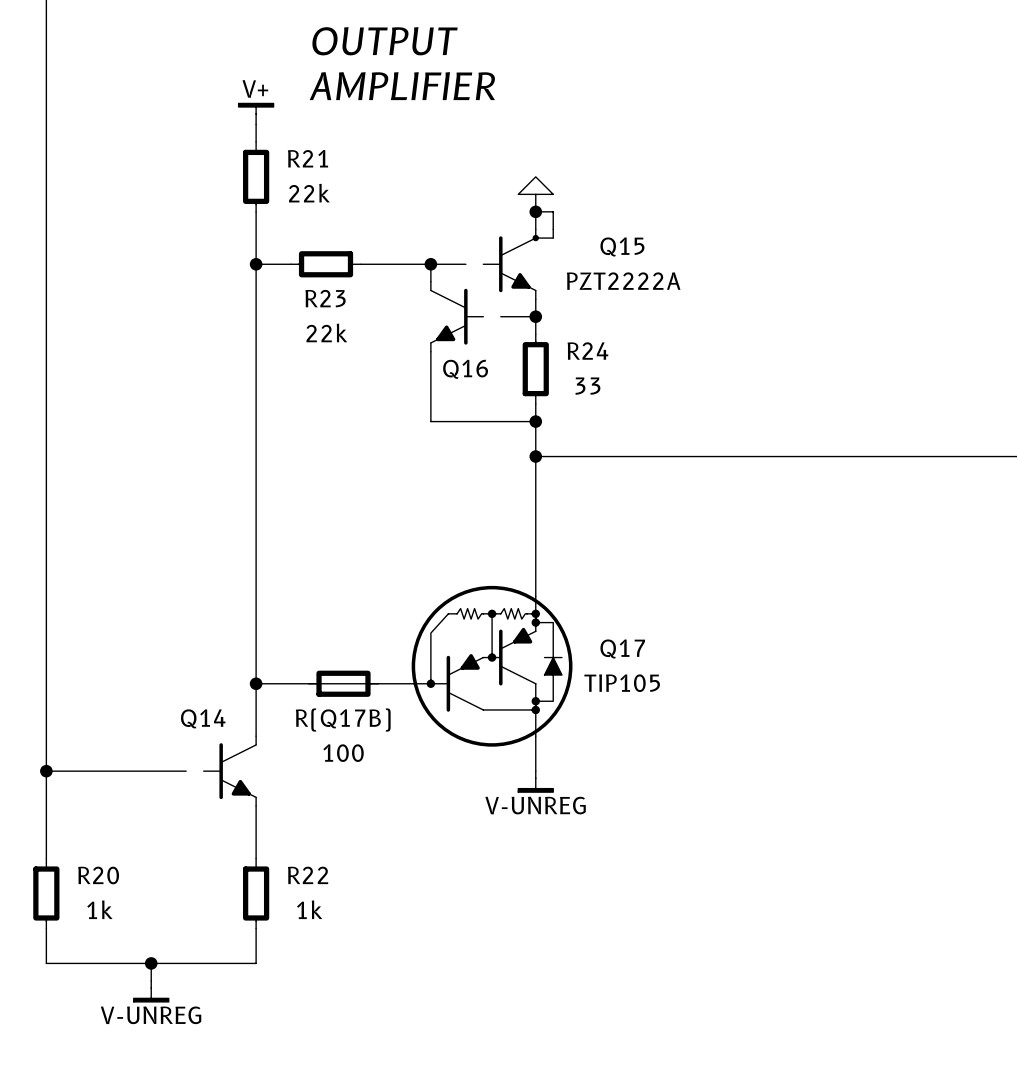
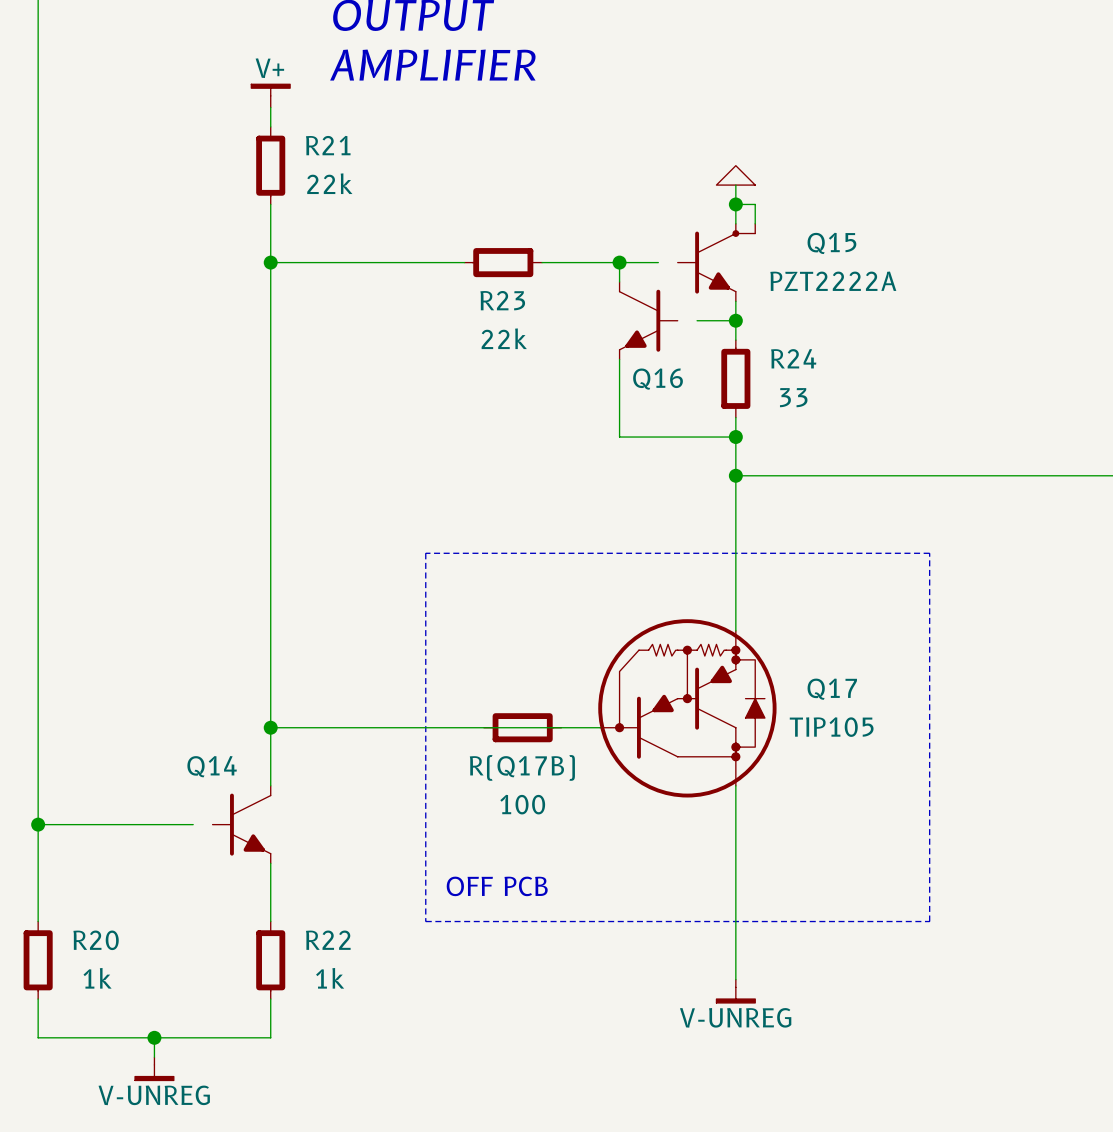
power symbol position: (535, 185) -> (735, 175)
wire: (535, 194) (535, 229) -> (735, 185) (735, 223)
wire: (535, 211) (553, 211) (553, 229) -> (735, 204) (755, 204) (755, 223)
junction: (535, 211) -> none
junction: none -> (735, 204)
wire: none -> (309, 262) (387, 262)
R23 position: (326, 264) -> (503, 262)
junction: (430, 264) -> none
wire: (465, 264) (430, 264) (430, 281) -> none
wire: none -> (542, 262) (658, 262)
Q15 position: (518, 264) -> (716, 262)
wire: none -> (619, 262) (619, 281)
junction: none -> (619, 262)
wire: (535, 299) (535, 334) -> (735, 301) (735, 340)
Q16 position: (457, 316) -> (648, 320)
wire: (500, 316) (535, 316) -> (697, 320) (735, 320)
junction: (535, 316) -> none
junction: none -> (735, 320)
wire: (430, 351) (430, 421) (535, 421) -> (619, 359) (619, 437) (735, 437)
R24 position: (535, 369) -> (735, 378)
wire: (535, 404) (535, 596) -> (735, 417) (735, 630)
junction: (535, 421) -> none
junction: none -> (735, 437)
wire: (535, 456) (675, 456) -> (445, 727) (600, 727)
junction: (535, 456) -> none
junction: none -> (735, 475)
line: none -> (425, 553) (425, 921) (929, 921) (929, 553) (425, 553)
Q17 position: (492, 666) -> (687, 708)
power symbol position: 100 (343, 683) -> 100 (522, 727)
wire: (535, 736) (535, 771) -> none
wire: none -> (735, 785) (735, 979)
power symbol position: V-UNREG (535, 781) -> V-UNREG (735, 991)
text: none -> OFF PCB (497, 886)

